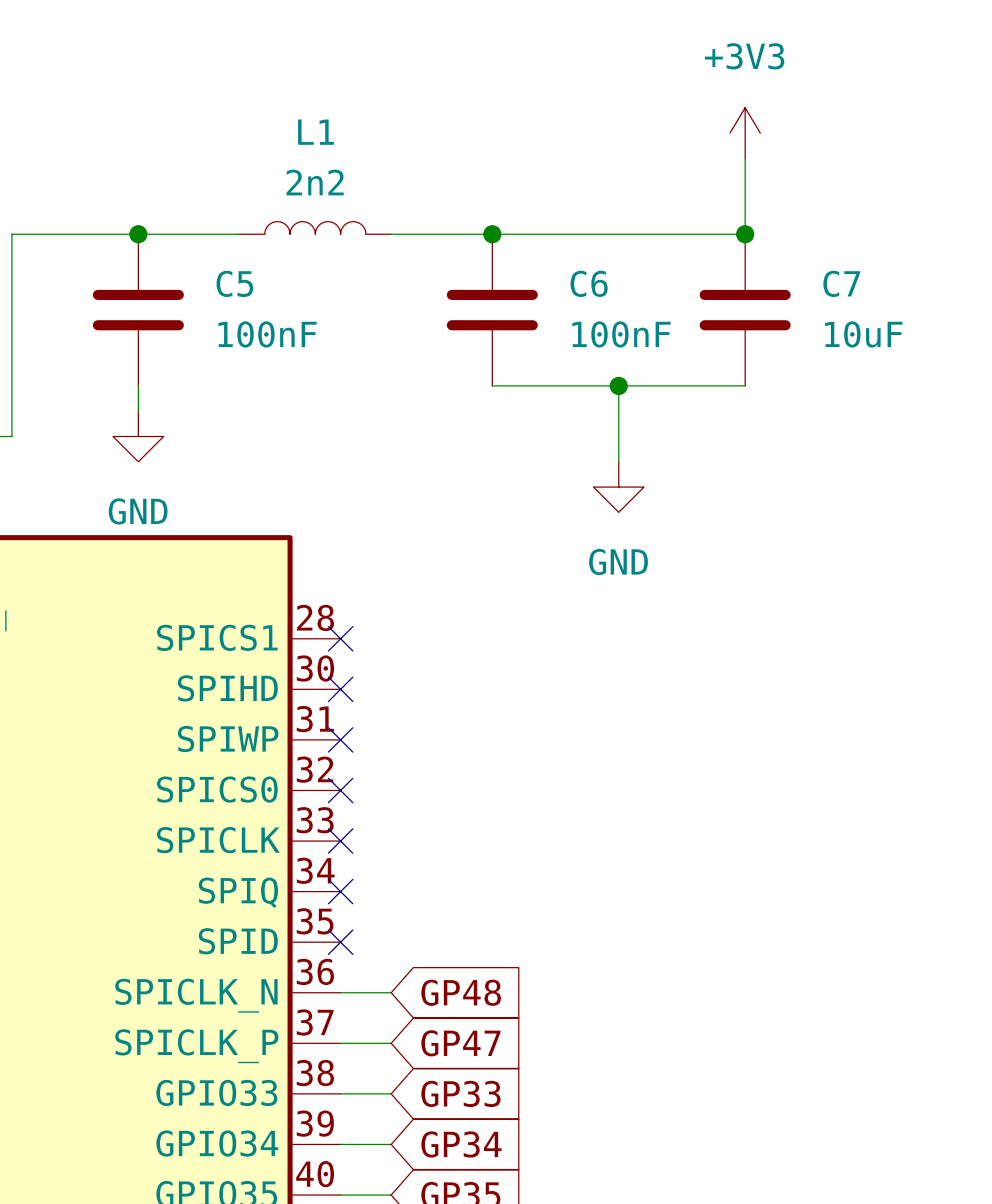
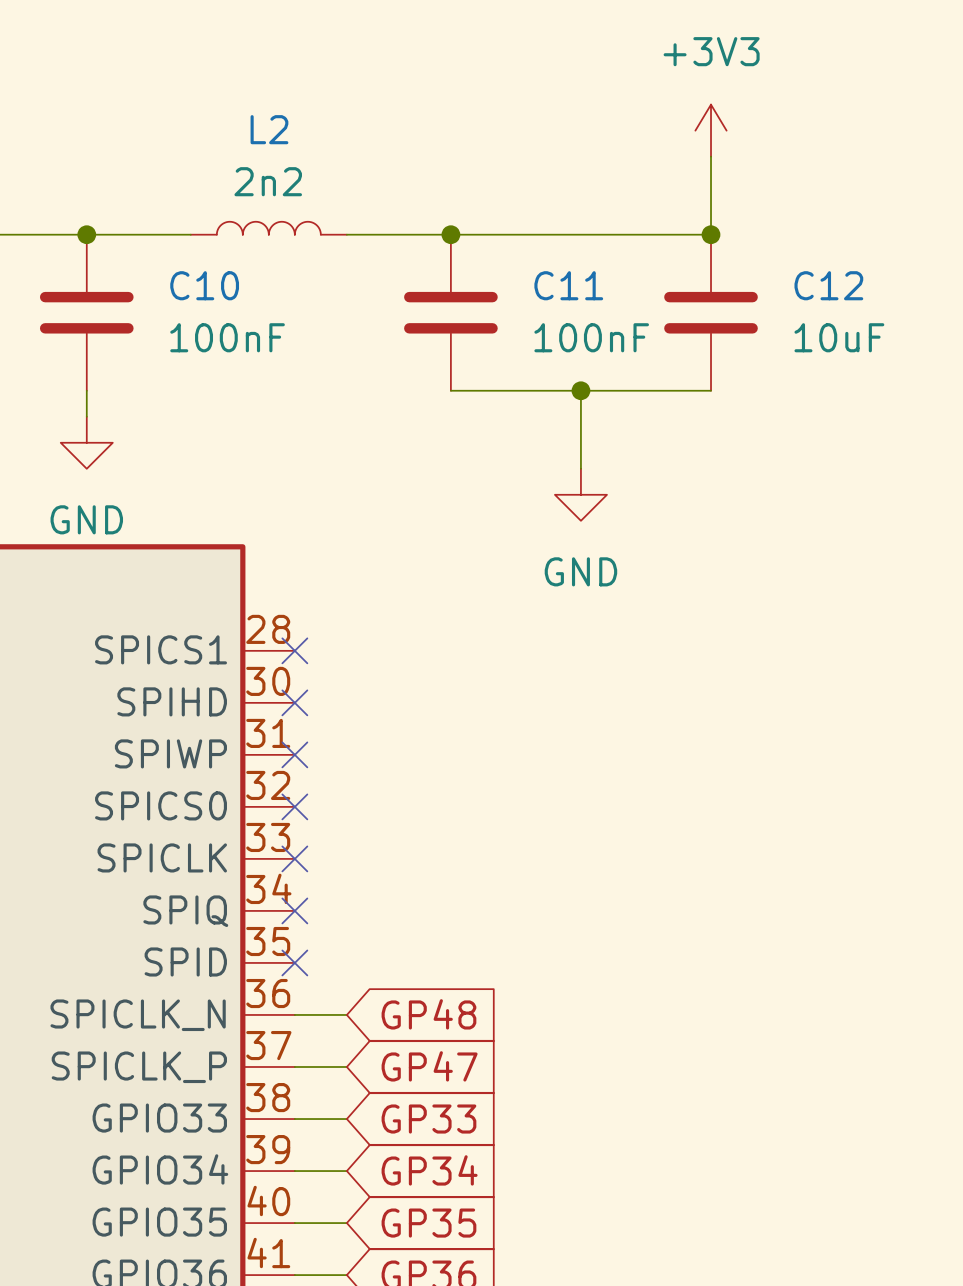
L1 name: L1 (315, 132) -> L2 (269, 129)
C5 name: C5 (234, 283) -> C10 (204, 285)
C6 name: C6 (589, 283) -> C11 (568, 285)
C7 name: C7 (841, 283) -> C12 (828, 285)

